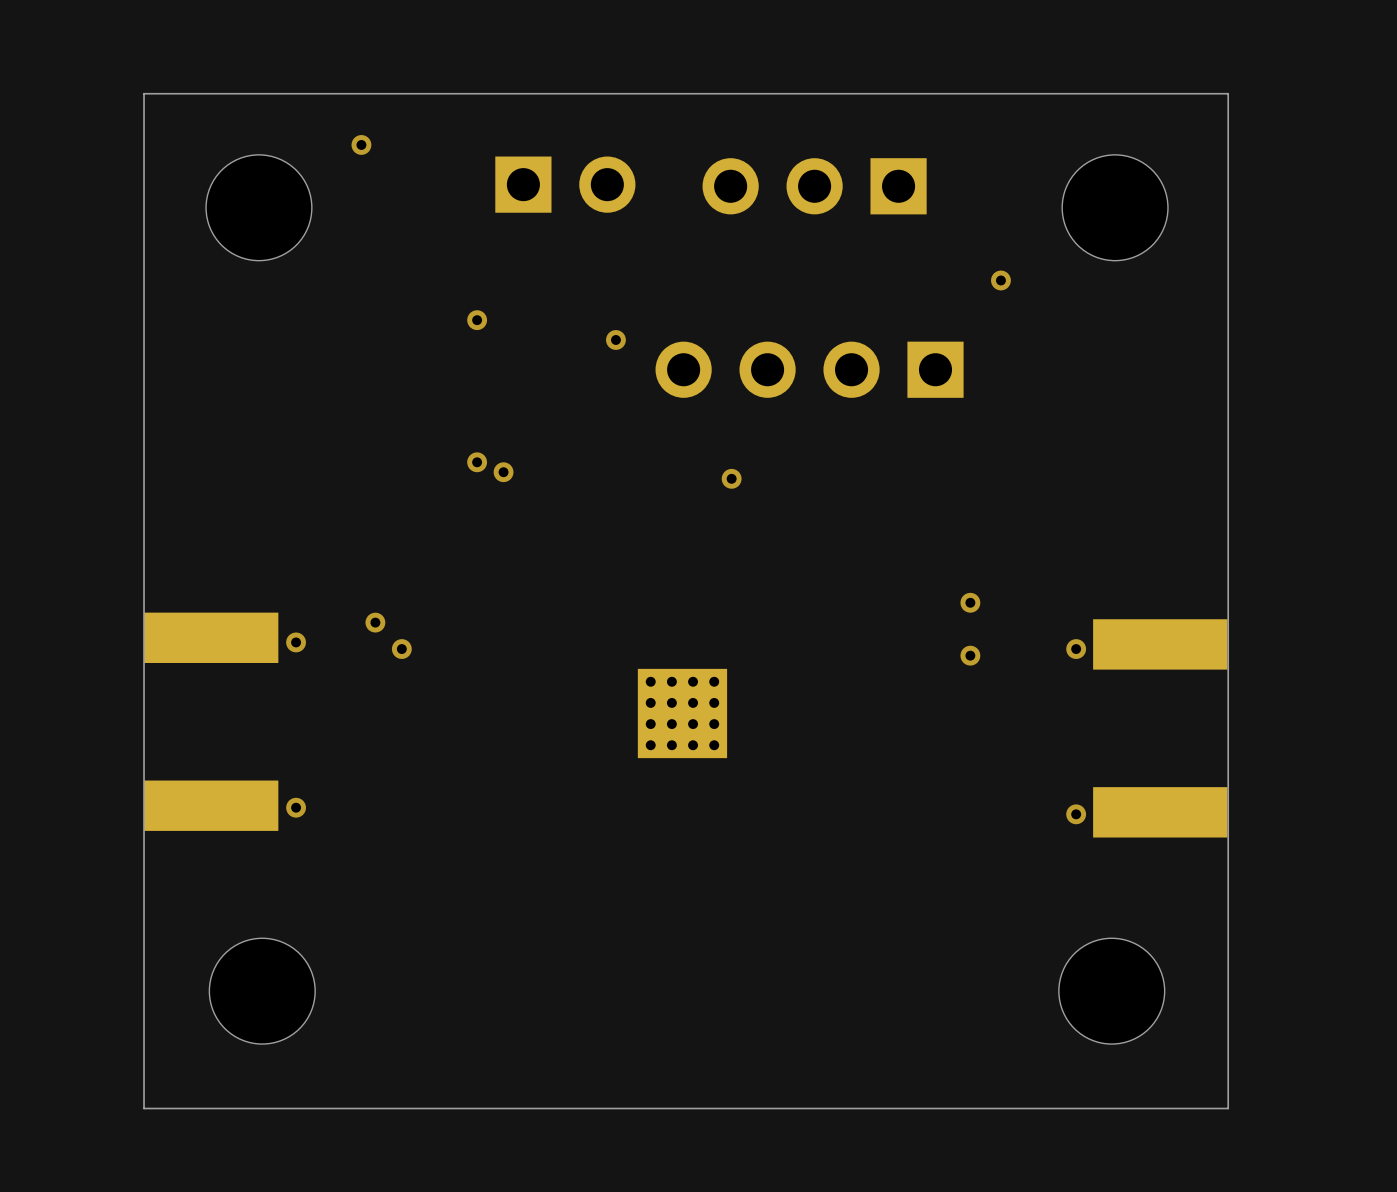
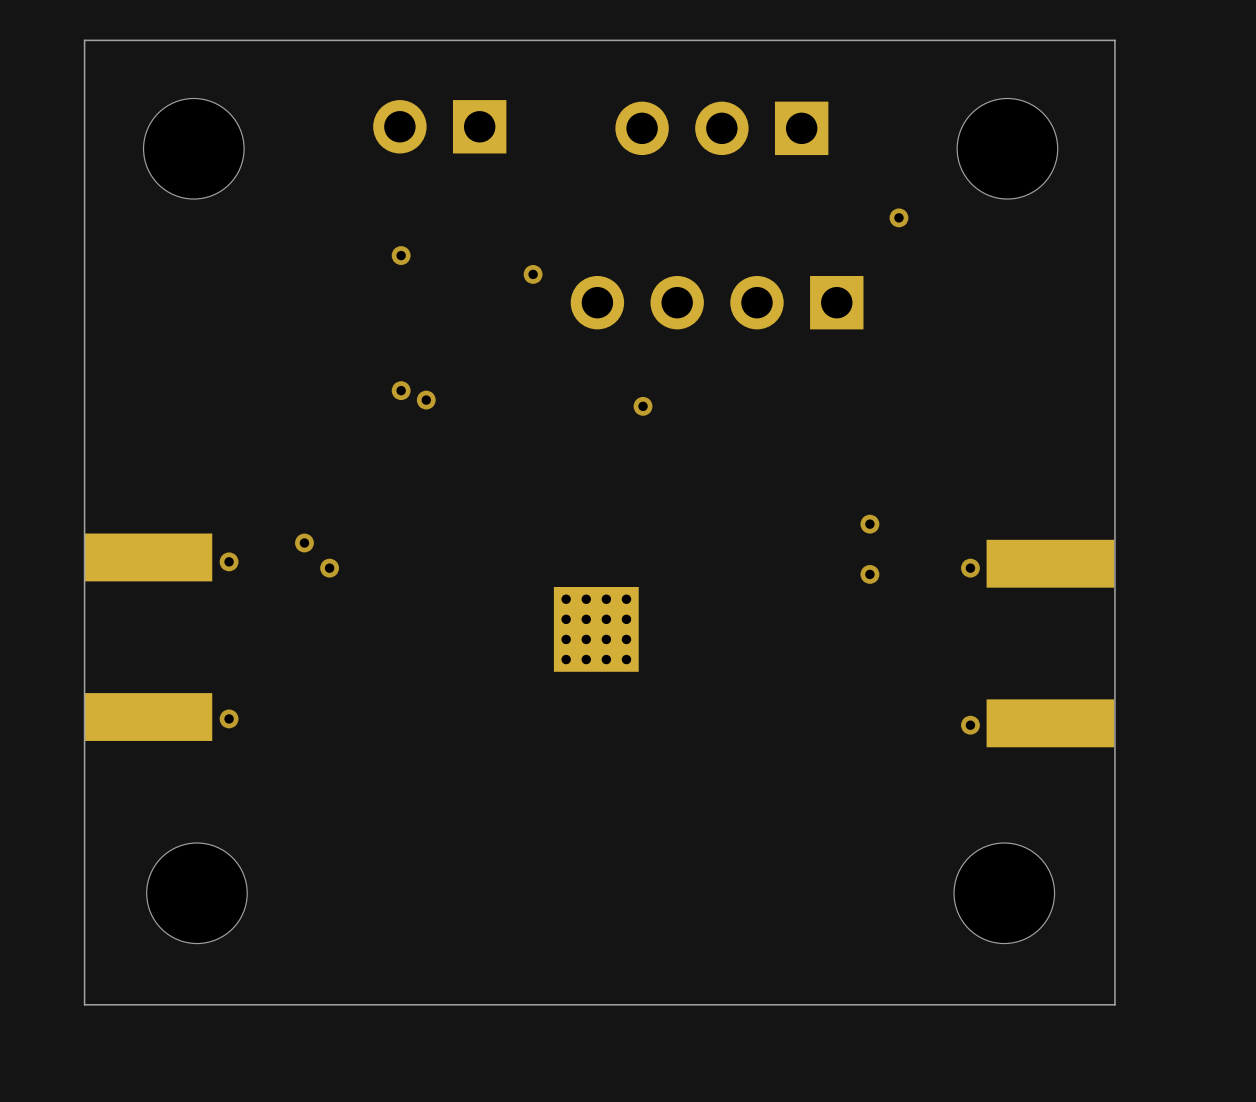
via: (361, 144) -> none
part rotation: 0° (565, 184) -> 180° (439, 126)

